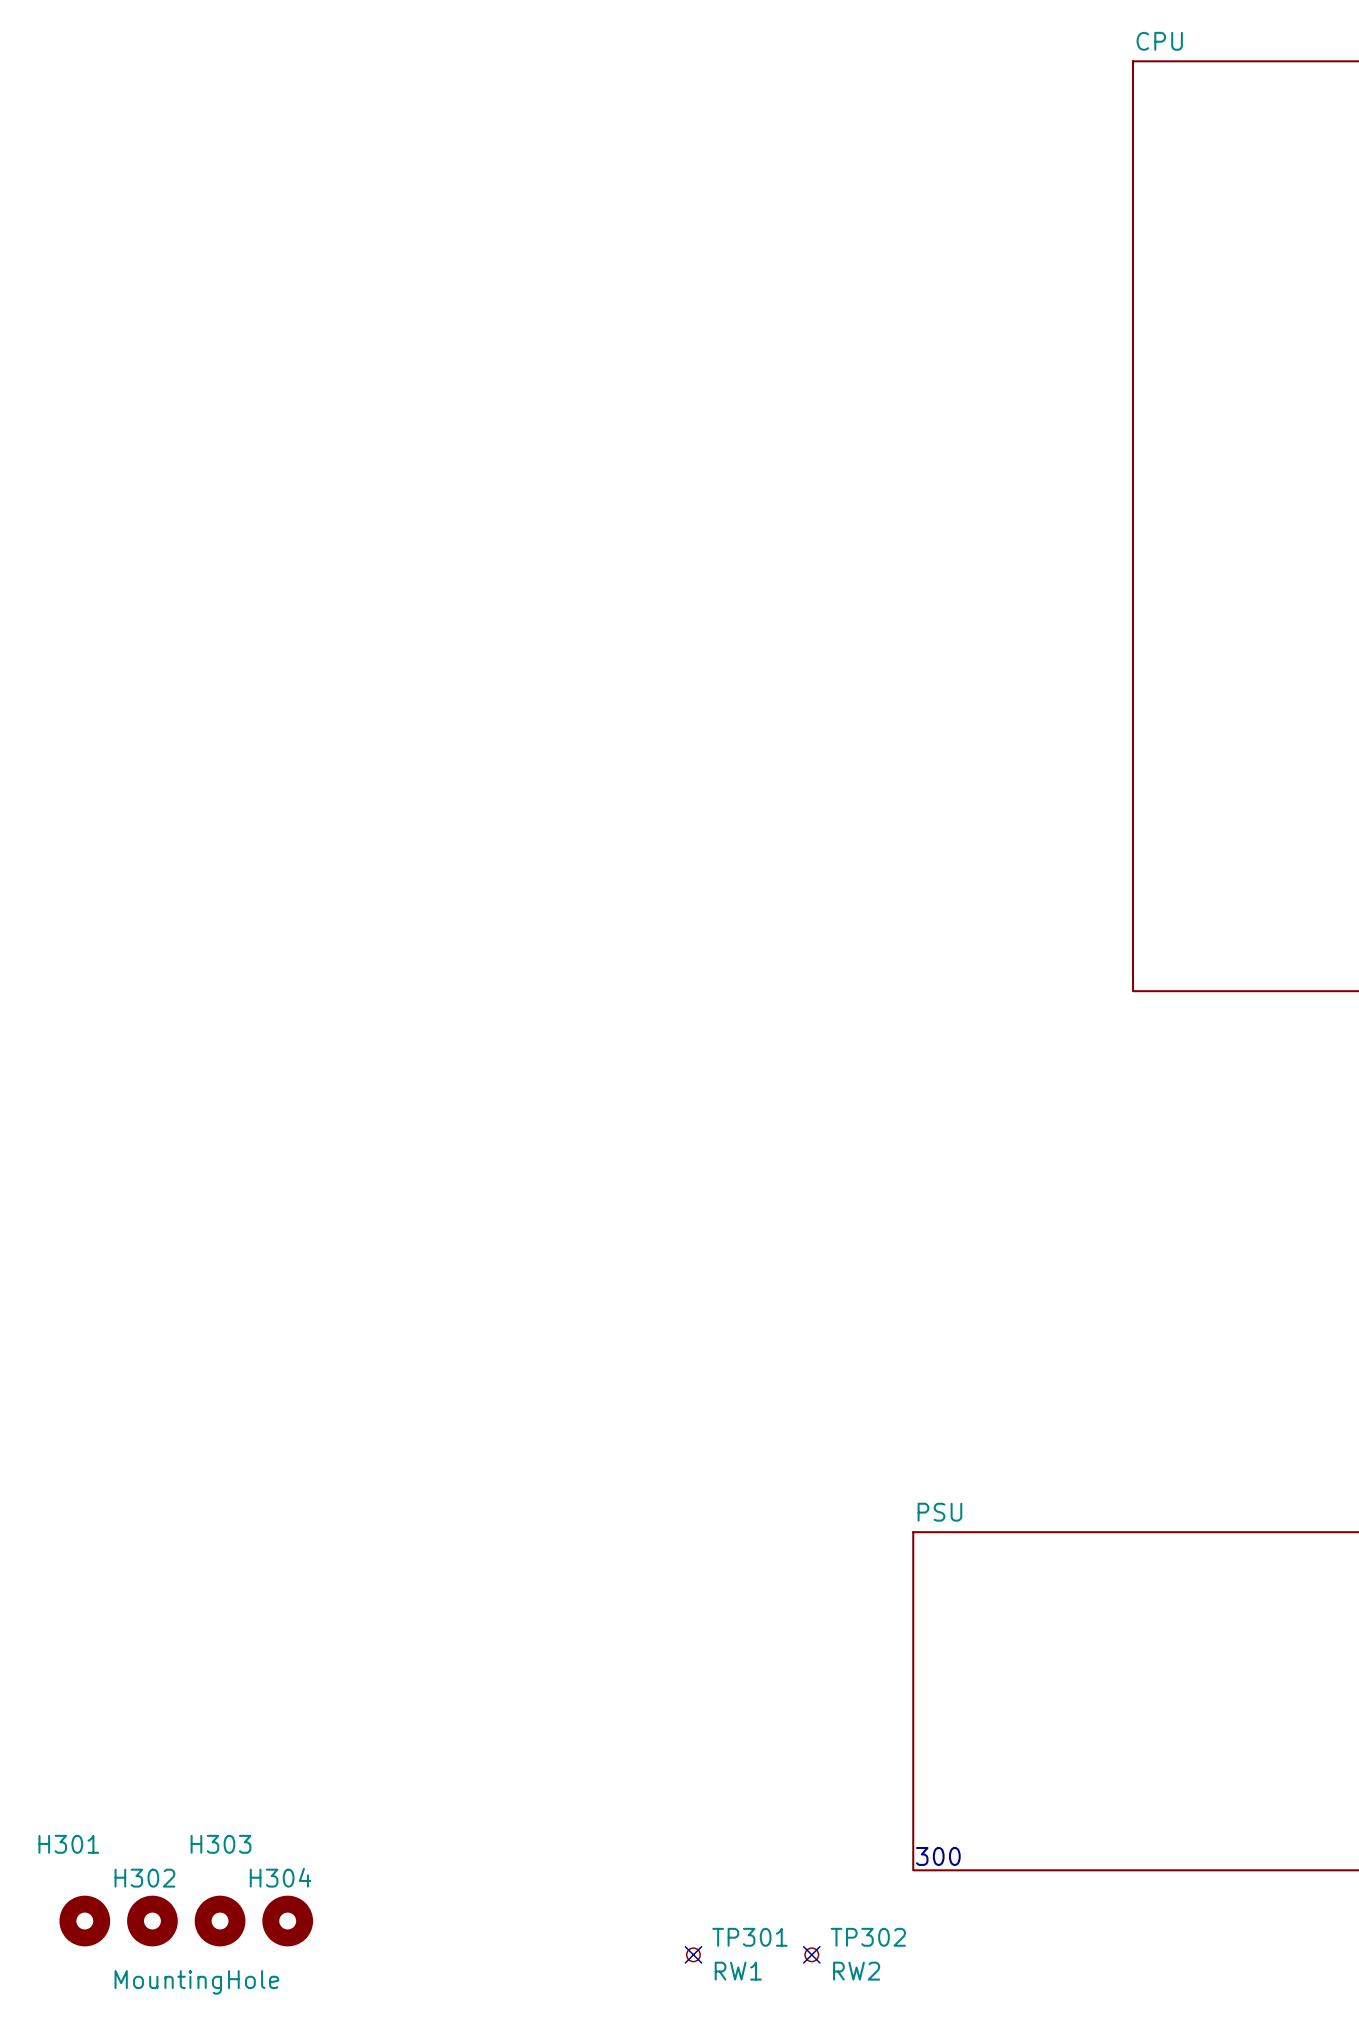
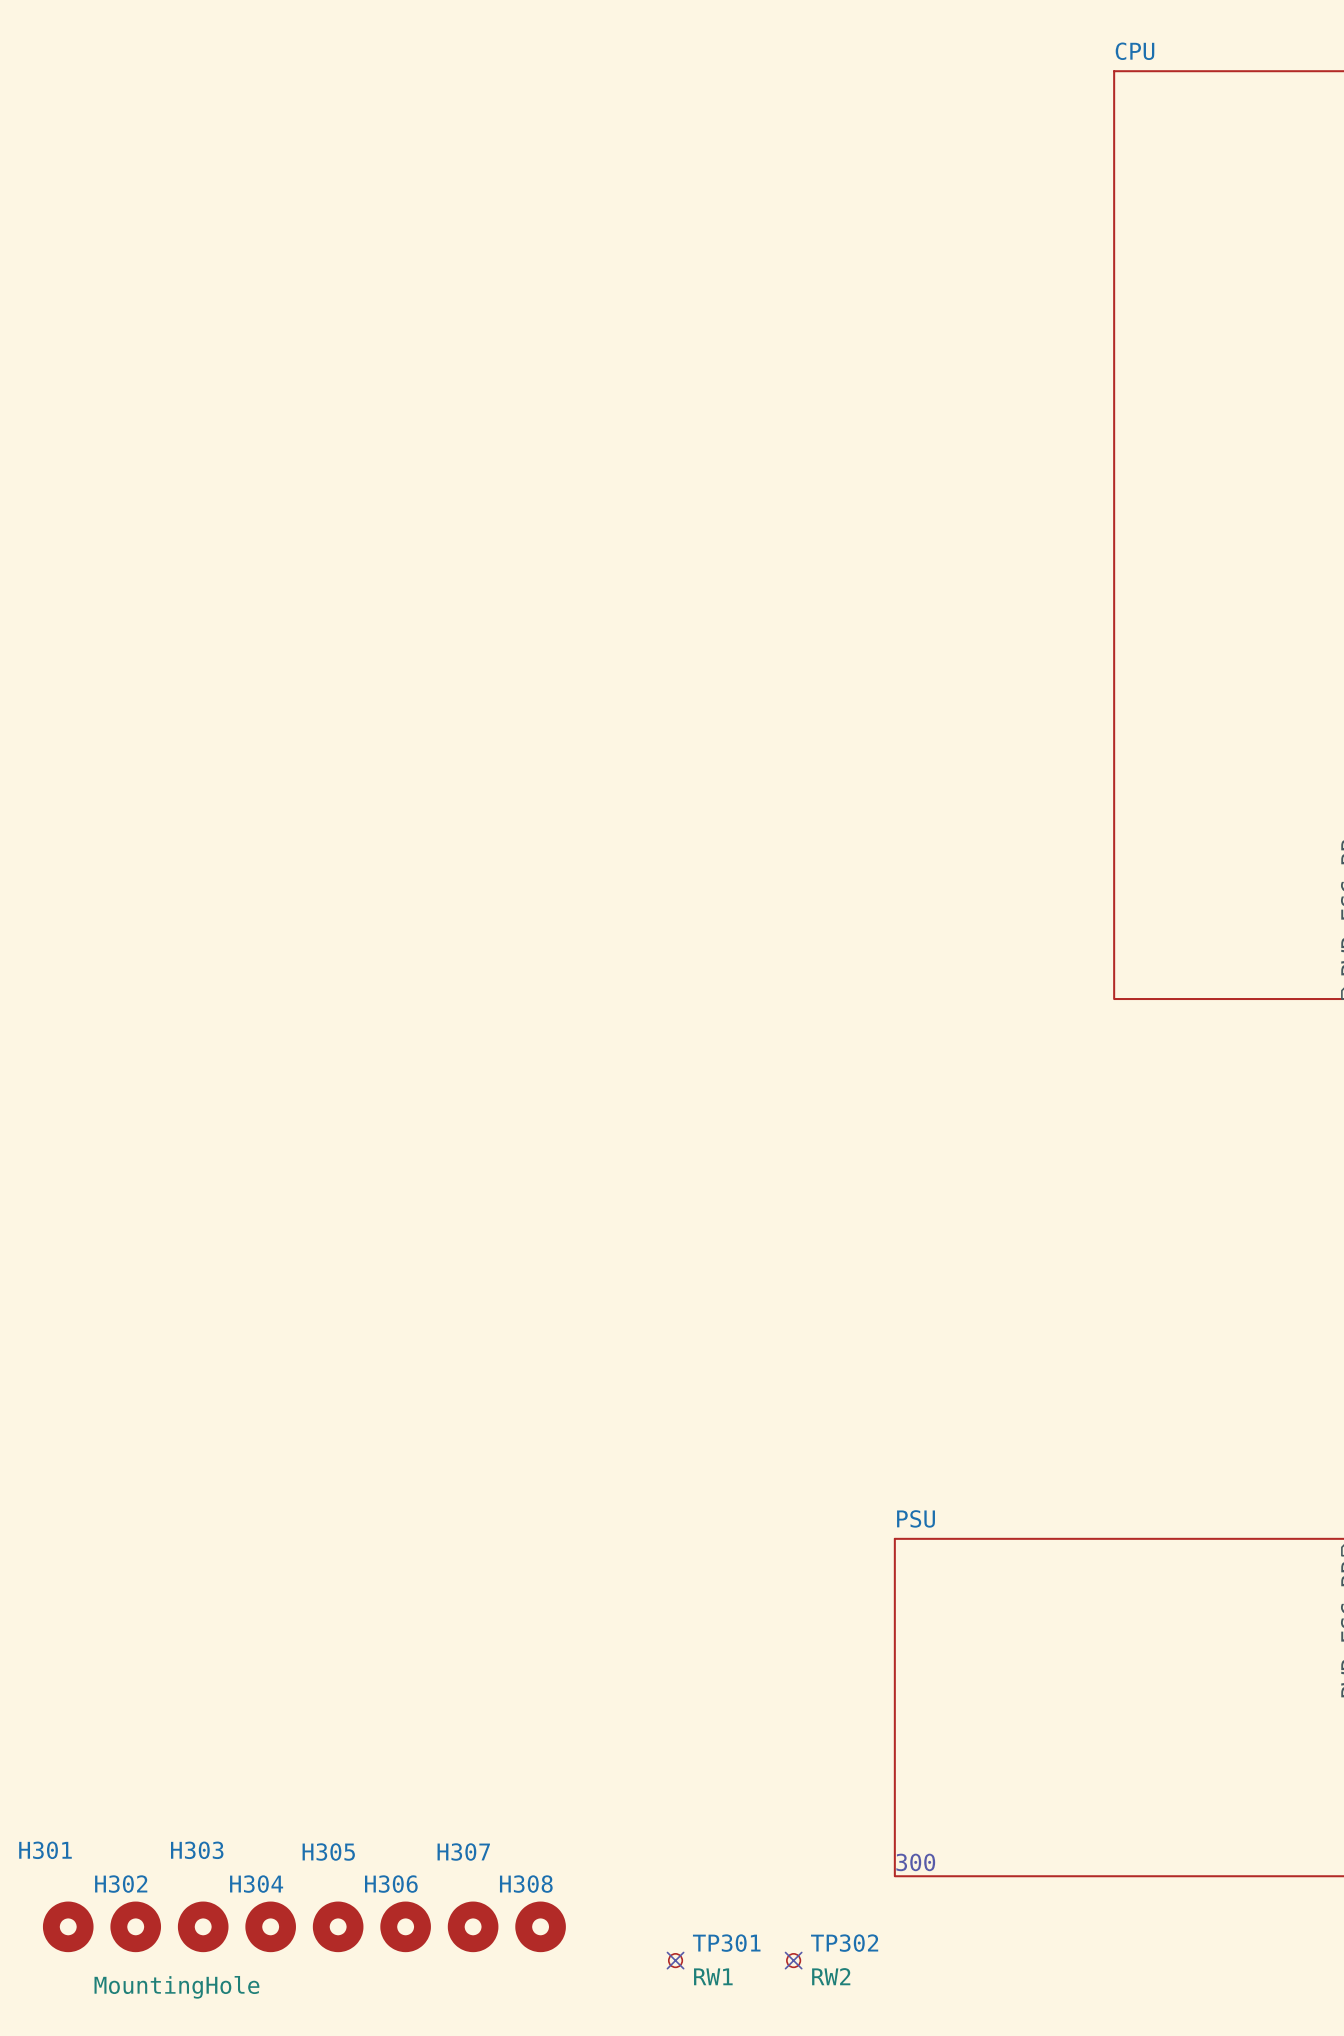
H305: none -> (338, 1926)
H306: none -> (405, 1926)
H307: none -> (473, 1926)
H308: none -> (540, 1926)

